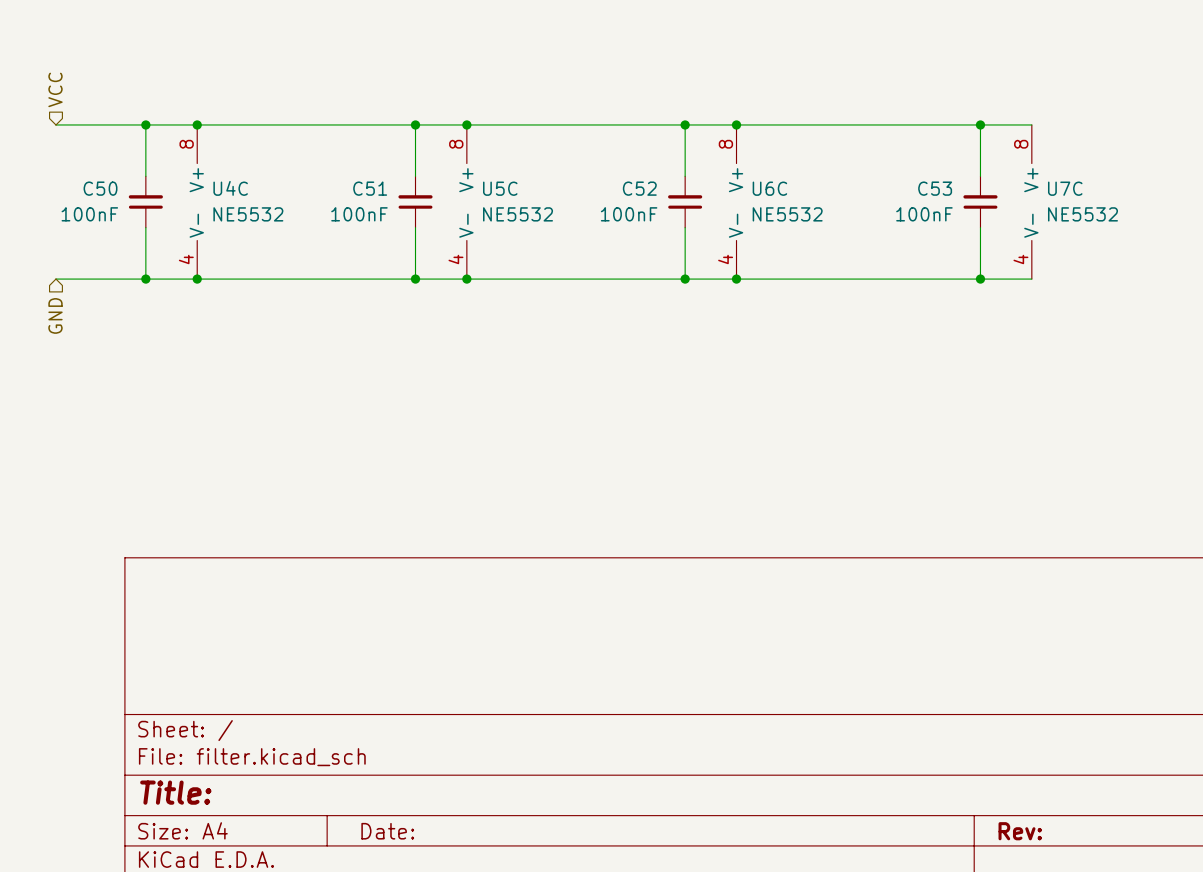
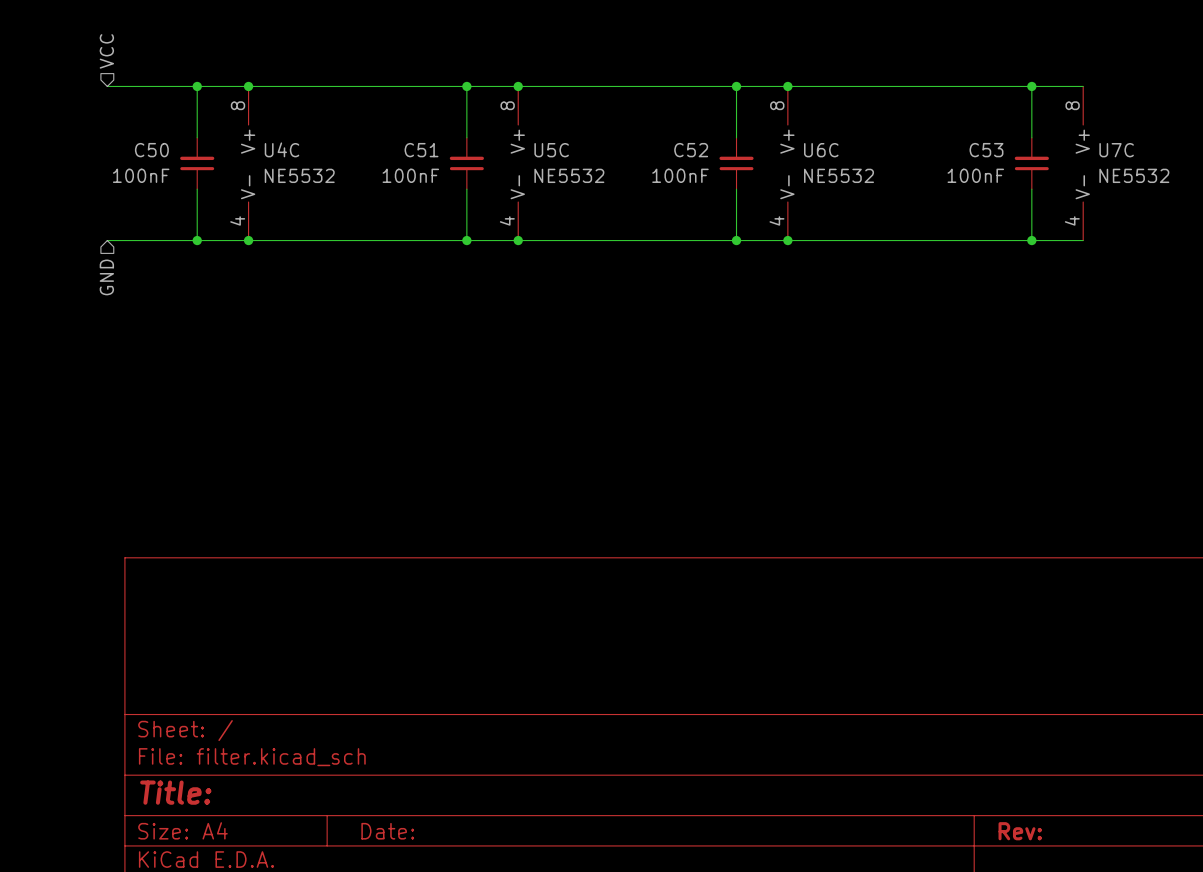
junction: none -> (197, 86)
junction: none -> (248, 86)
junction: none -> (466, 86)
junction: none -> (518, 86)
junction: none -> (736, 86)
junction: none -> (787, 86)
junction: none -> (1031, 86)
hierarchical label position: VCC (55, 89) -> VCC (106, 51)
wire: (55, 124) (1031, 124) -> (107, 86) (1083, 86)
wire: (145, 124) (145, 176) -> (197, 86) (197, 137)
junction: (145, 124) -> none
junction: (197, 124) -> none
wire: (415, 124) (415, 176) -> (466, 86) (466, 137)
junction: (415, 124) -> none
junction: (466, 124) -> none
wire: (685, 124) (685, 176) -> (736, 86) (736, 137)
junction: (685, 124) -> none
junction: (736, 124) -> none
wire: (980, 124) (980, 176) -> (1031, 86) (1031, 137)
junction: (980, 124) -> none
C50 position: (145, 202) -> (197, 163)
U4C position: (197, 202) -> (248, 163)
C51 position: (415, 202) -> (466, 163)
U5C position: (466, 202) -> (518, 163)
C52 position: (685, 202) -> (736, 163)
U6C position: (736, 202) -> (787, 163)
C53 position: (980, 202) -> (1031, 163)
U7C position: (1031, 202) -> (1083, 163)
wire: (145, 227) (145, 279) -> (197, 189) (197, 240)
wire: (415, 227) (415, 279) -> (466, 189) (466, 240)
wire: (685, 227) (685, 279) -> (736, 189) (736, 240)
wire: (980, 227) (980, 279) -> (1031, 189) (1031, 240)
junction: none -> (197, 240)
junction: none -> (248, 240)
junction: none -> (466, 240)
junction: none -> (518, 240)
junction: none -> (736, 240)
junction: none -> (787, 240)
junction: none -> (1031, 240)
wire: (55, 279) (1031, 279) -> (107, 240) (1083, 240)
junction: (145, 279) -> none
junction: (197, 279) -> none
junction: (415, 279) -> none
junction: (466, 279) -> none
junction: (685, 279) -> none
junction: (736, 279) -> none
junction: (980, 279) -> none
hierarchical label position: GND (55, 315) -> GND (106, 277)

